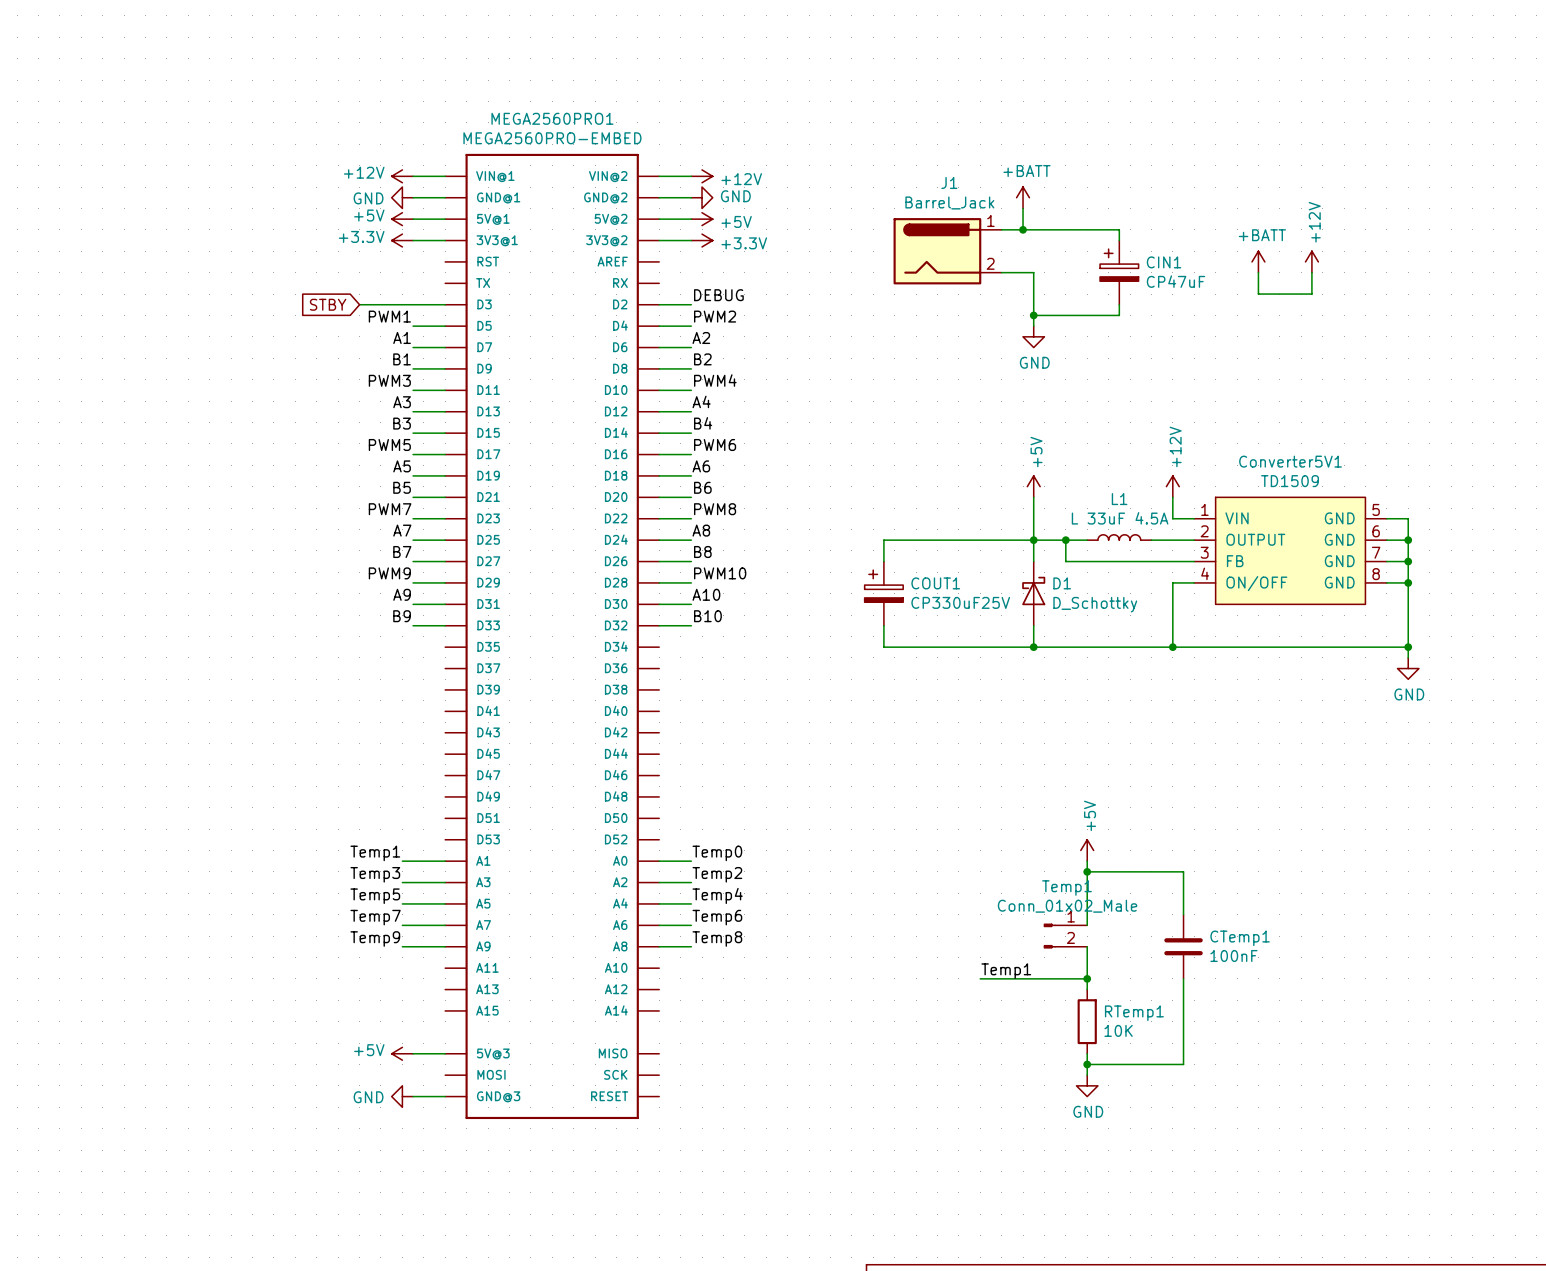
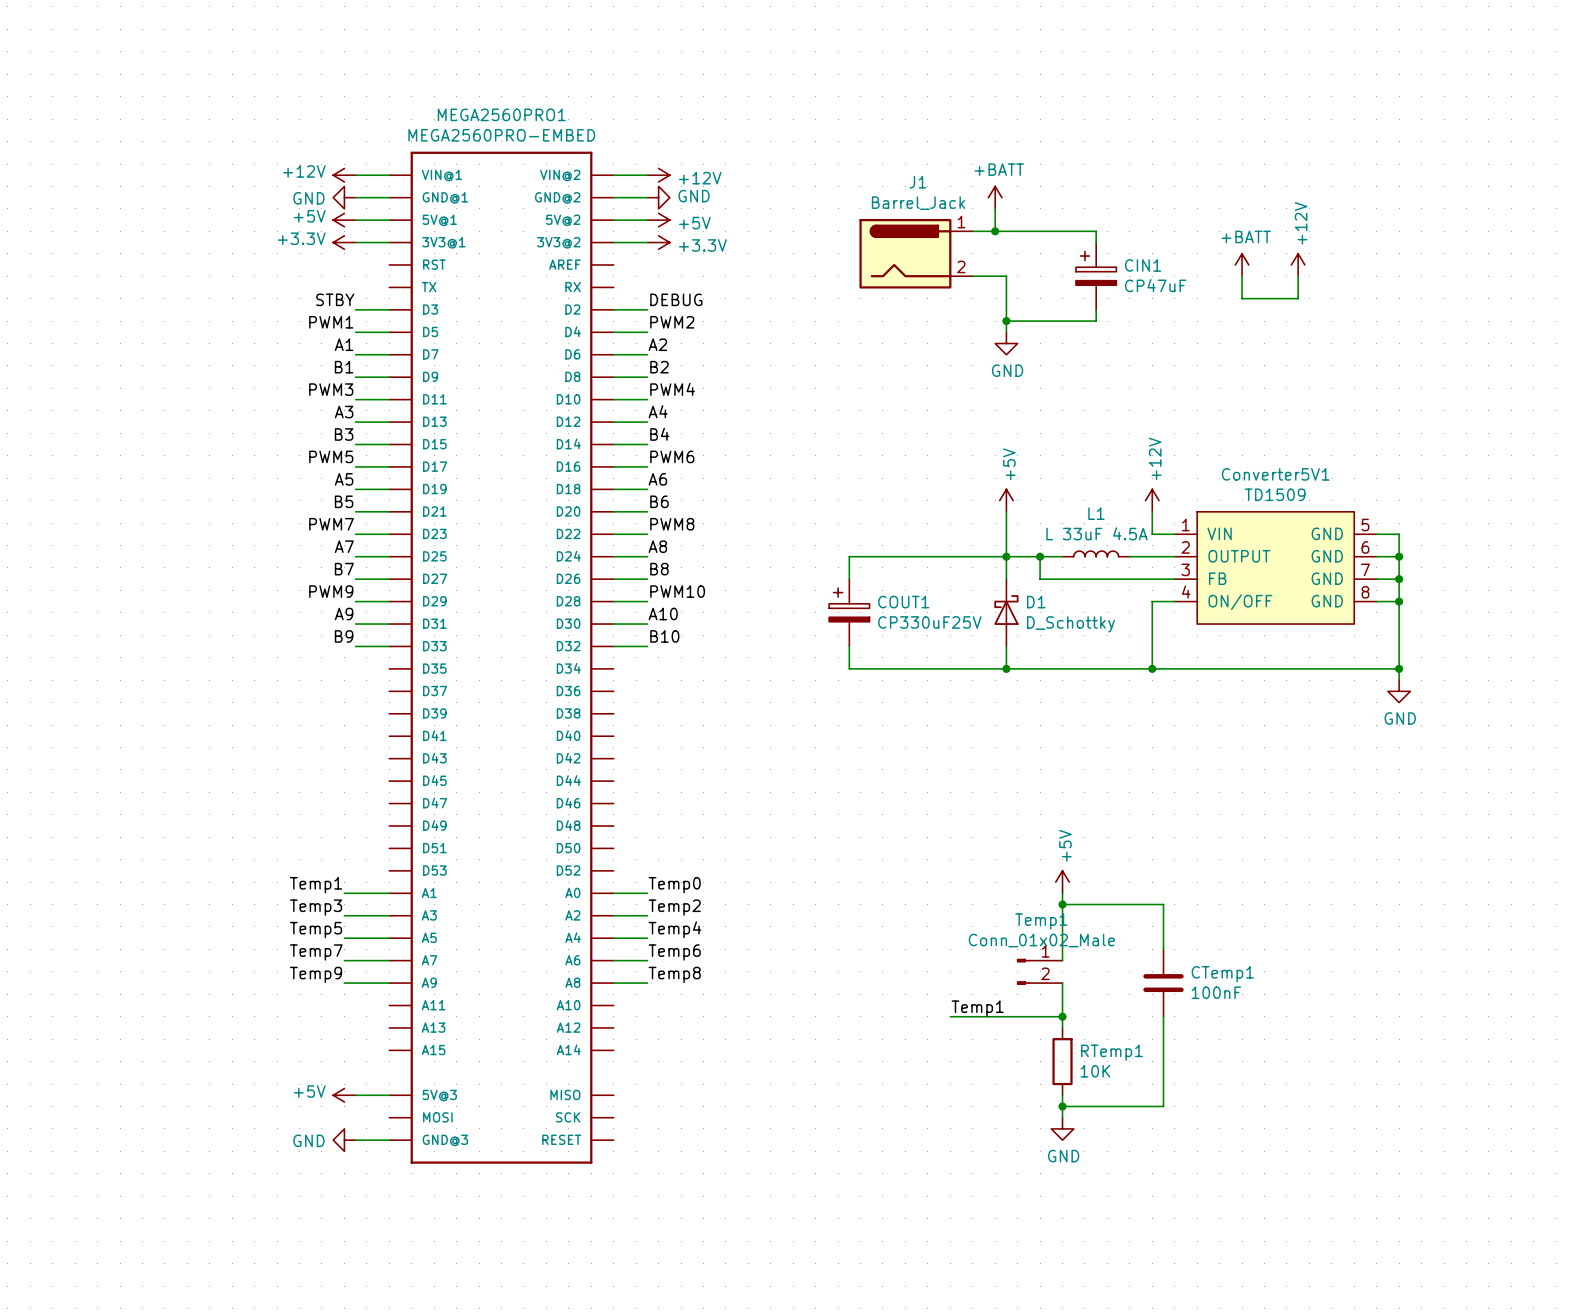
label: none -> STBY (335, 299)
global label: STBY (328, 304) -> none
wire: (359, 304) (413, 304) -> none

